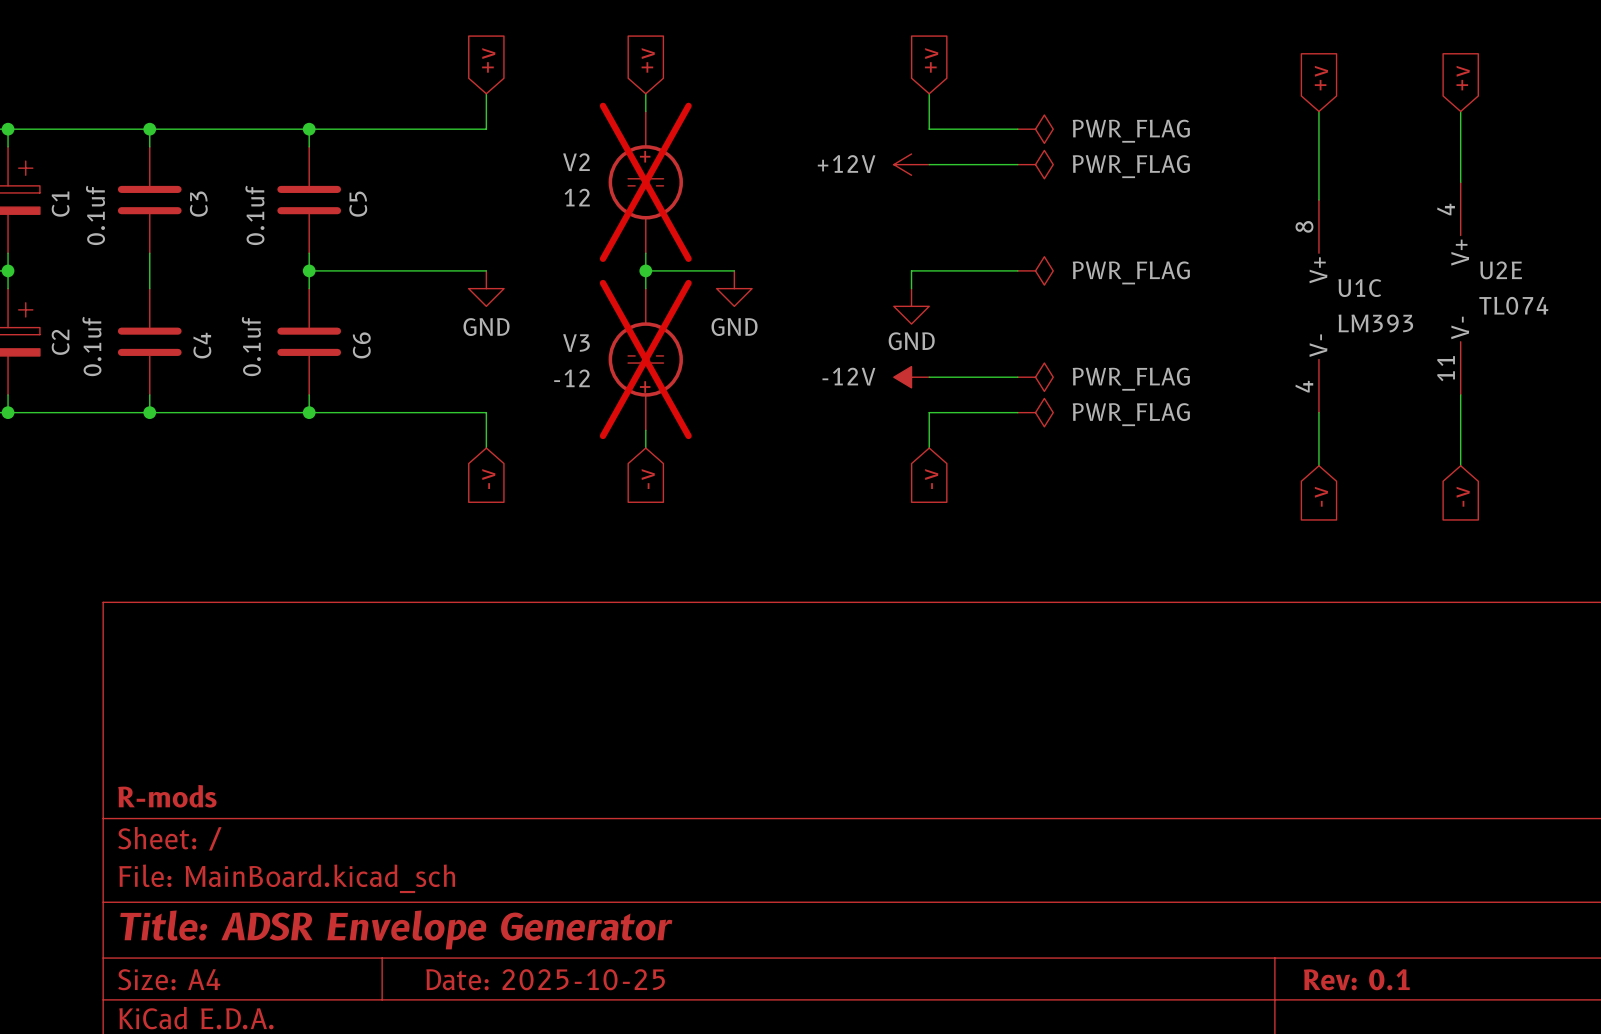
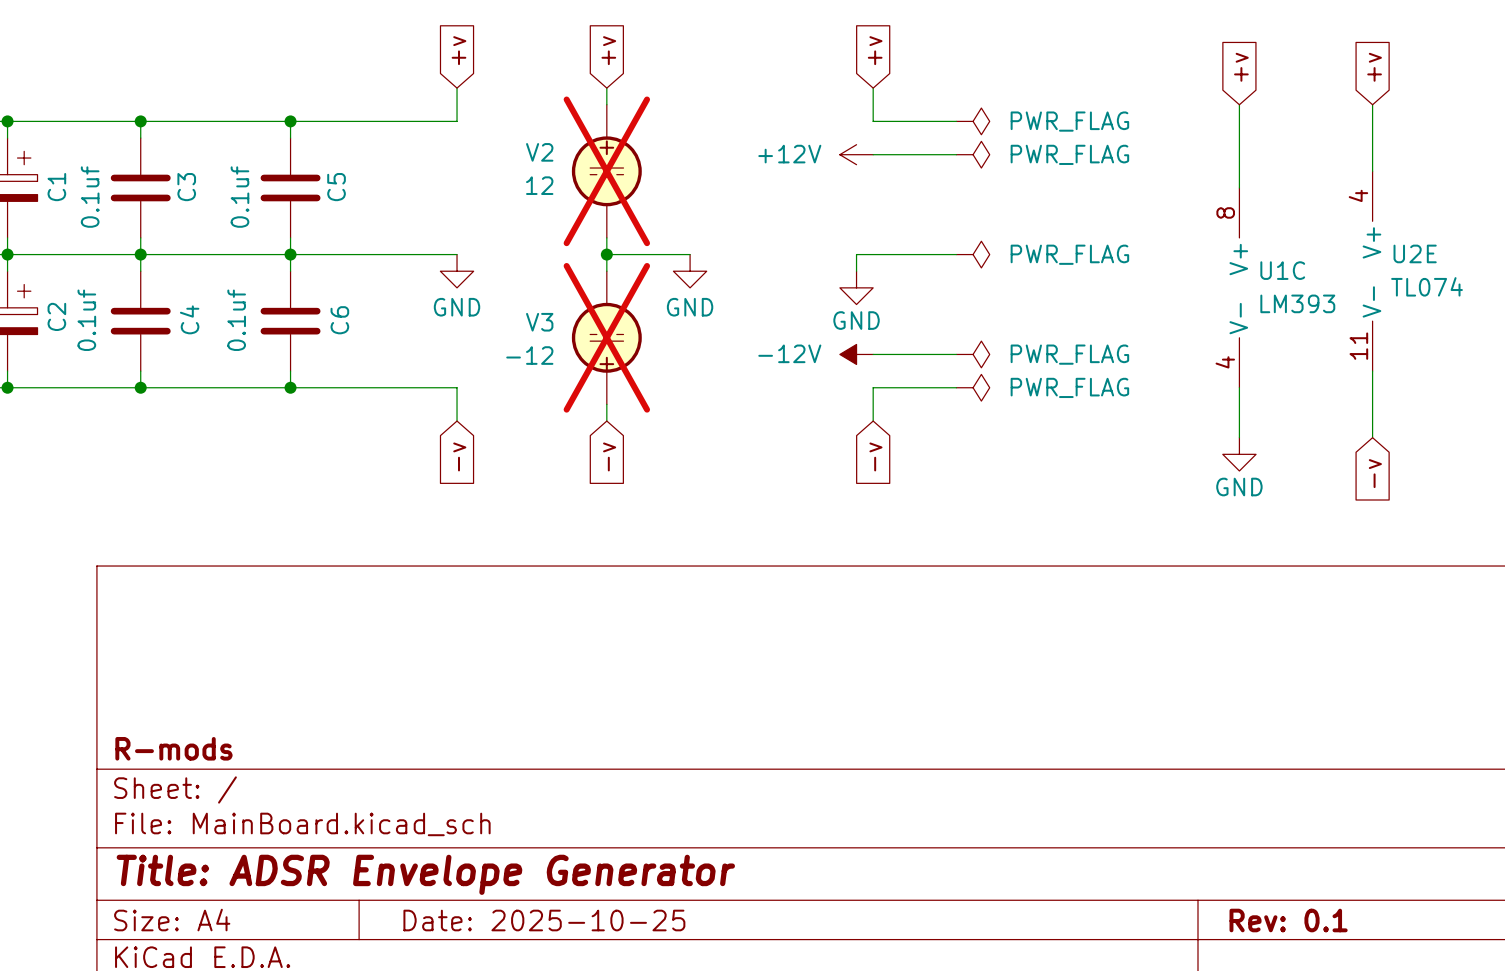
wire: none -> (7, 254) (290, 254)
junction: none -> (140, 254)
power symbol: none -> GND (1239, 454)
global label: -v (1321, 496) -> none

